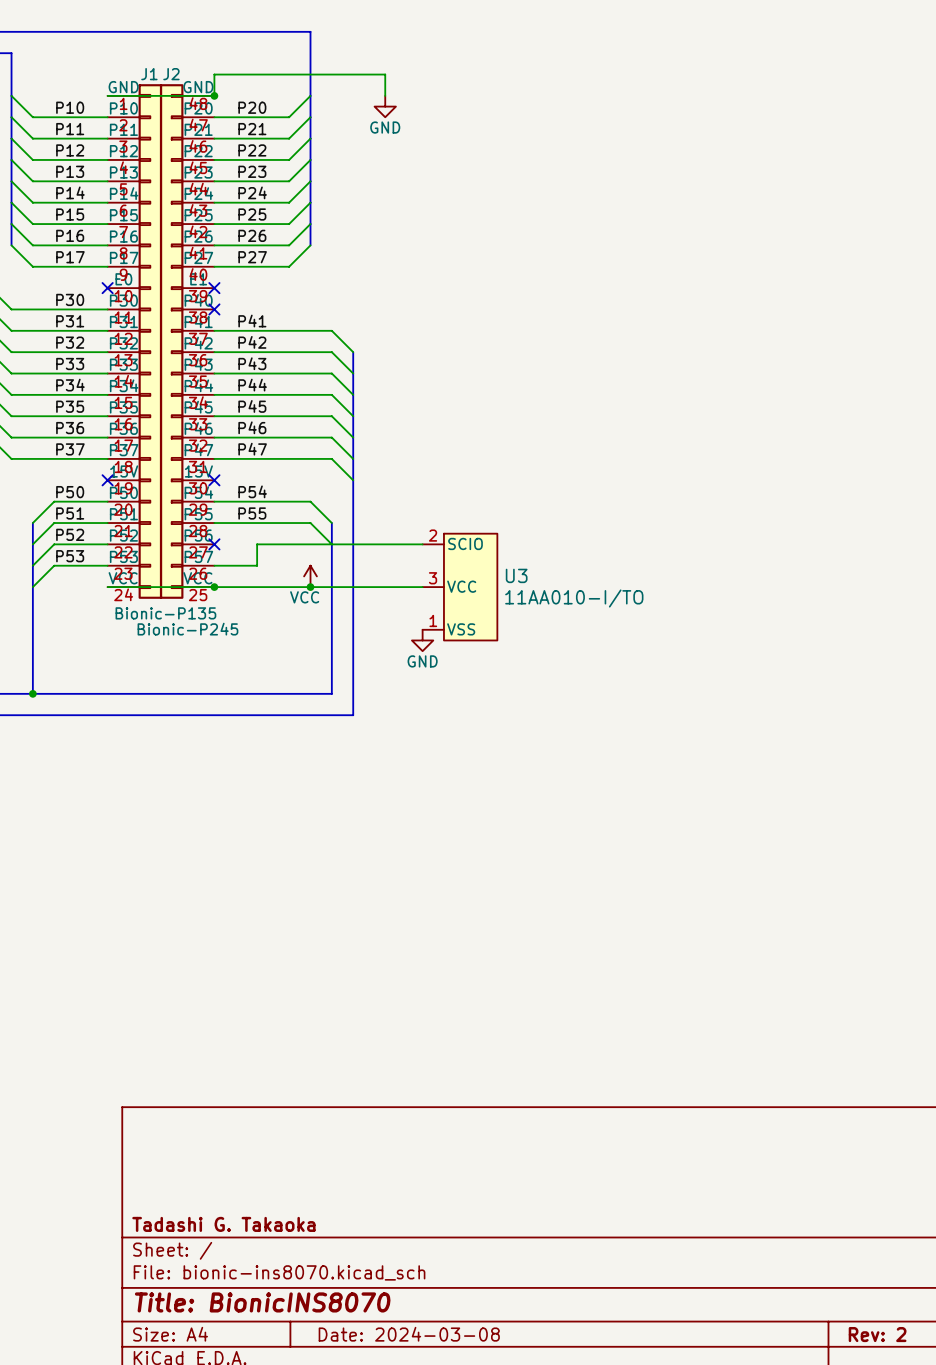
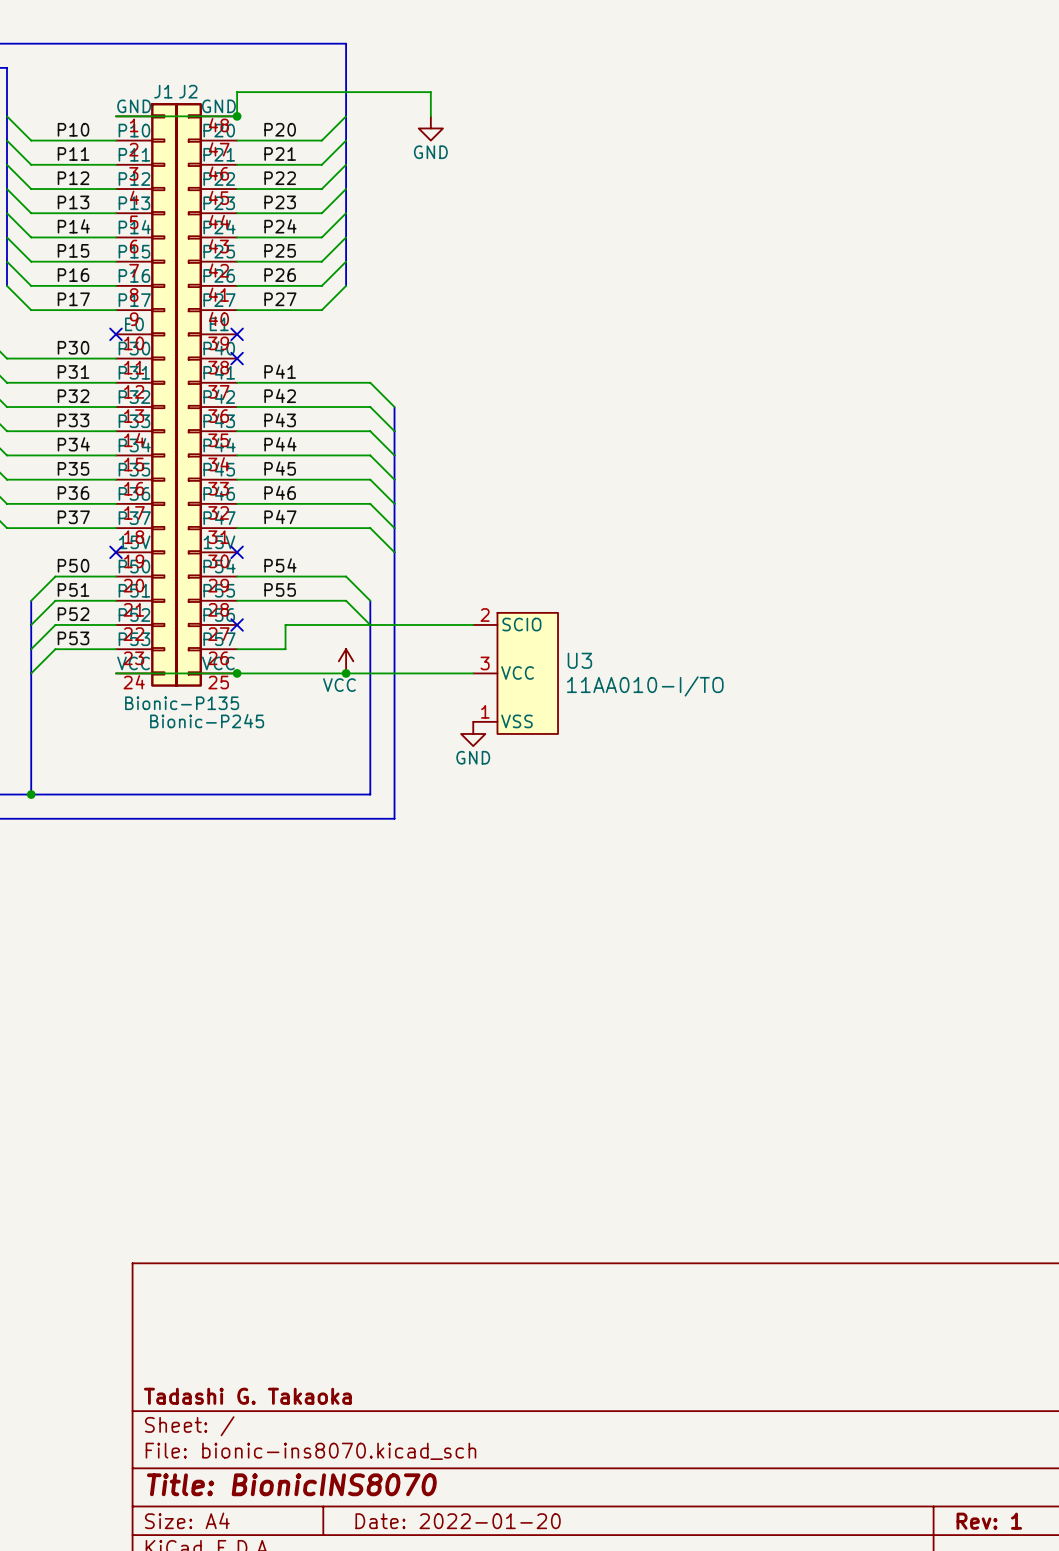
title block: Date: 2024-03-08 (409, 1334) -> Date: 2022-01-20 (458, 1521)
title block: Rev: 2 (877, 1334) -> Rev: 1 (989, 1521)

